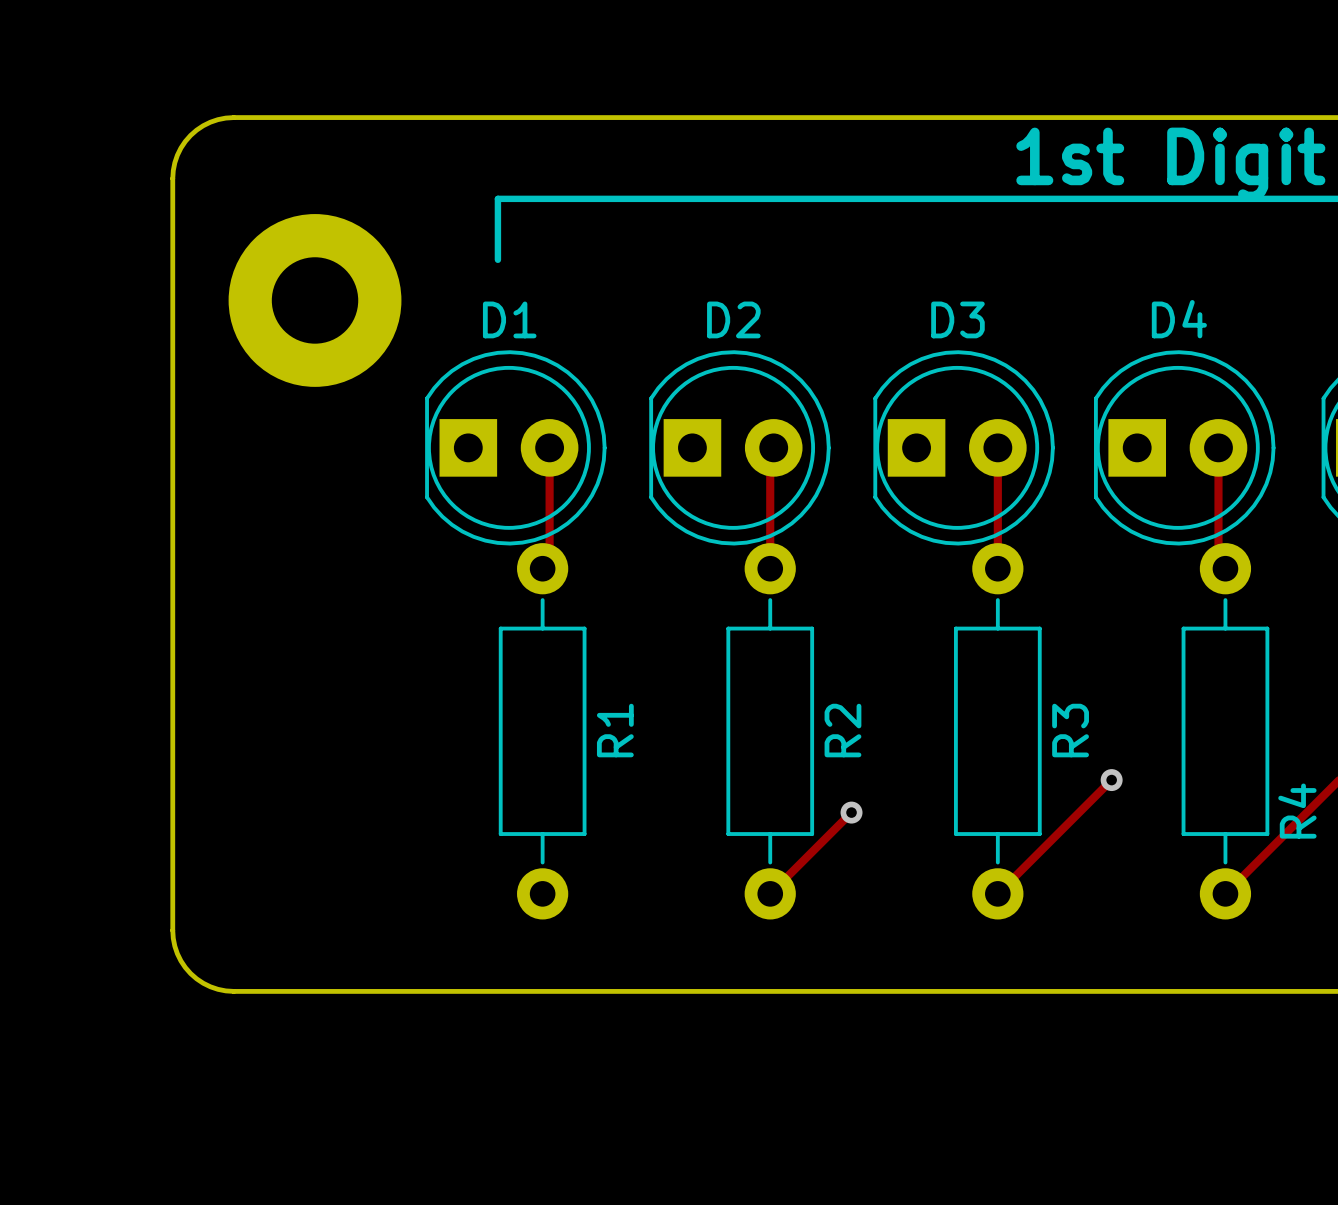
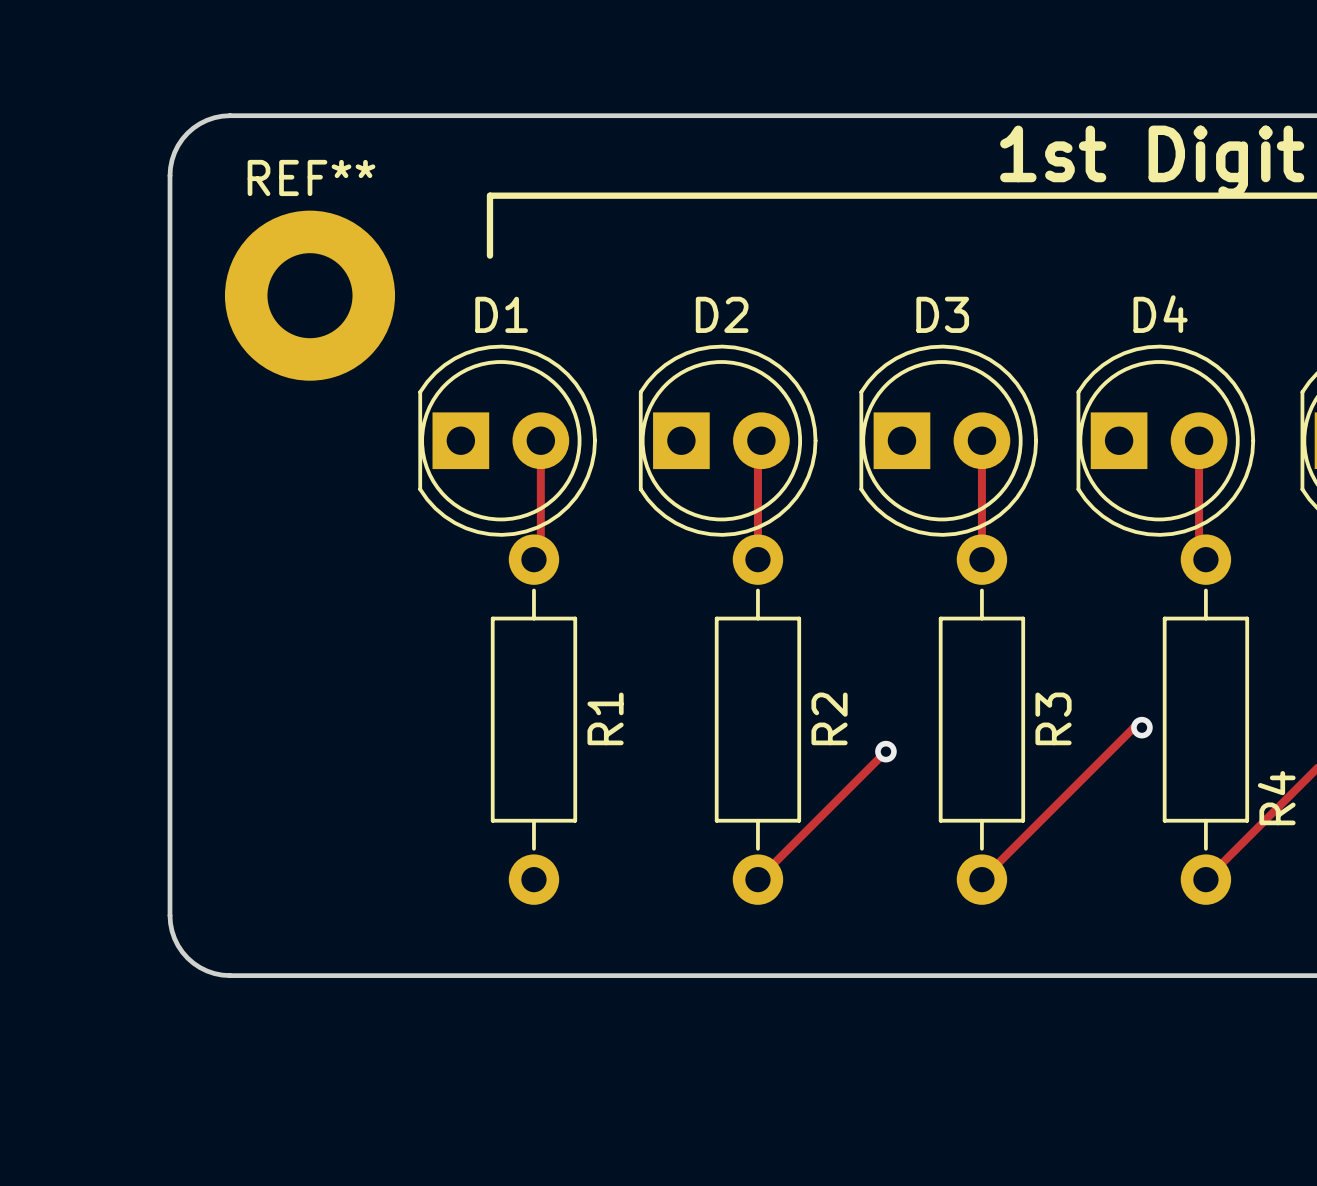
REF** name: none -> REF** (311, 177)
track: none -> (1141, 727) (1133, 727) (1093, 767)
track: none -> (885, 751) (837, 799)
via position: (1111, 780) -> (1141, 727)
via position: (851, 812) -> (885, 751)

